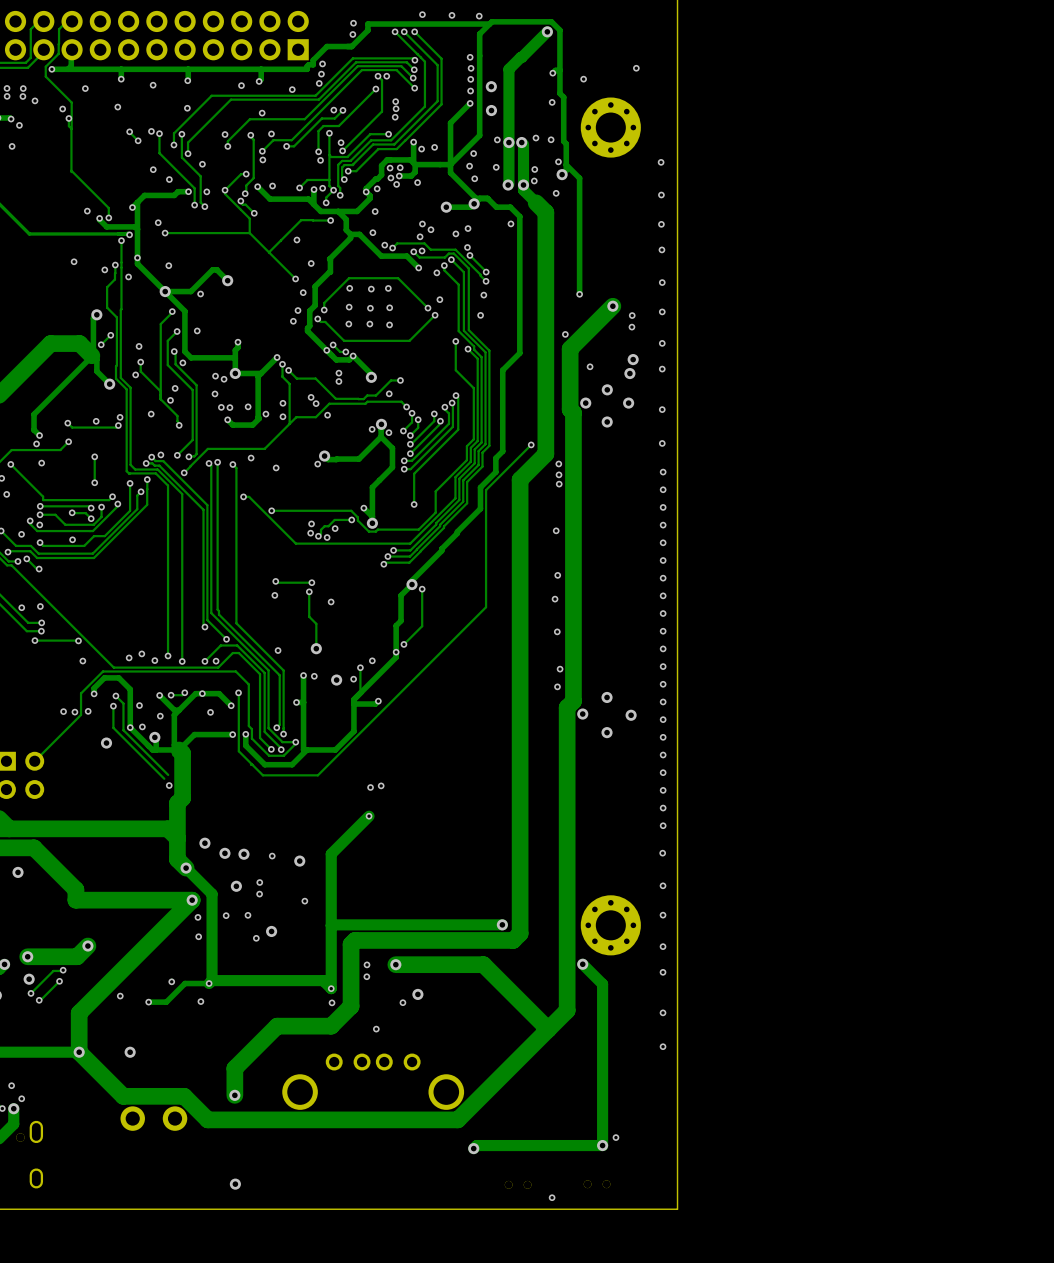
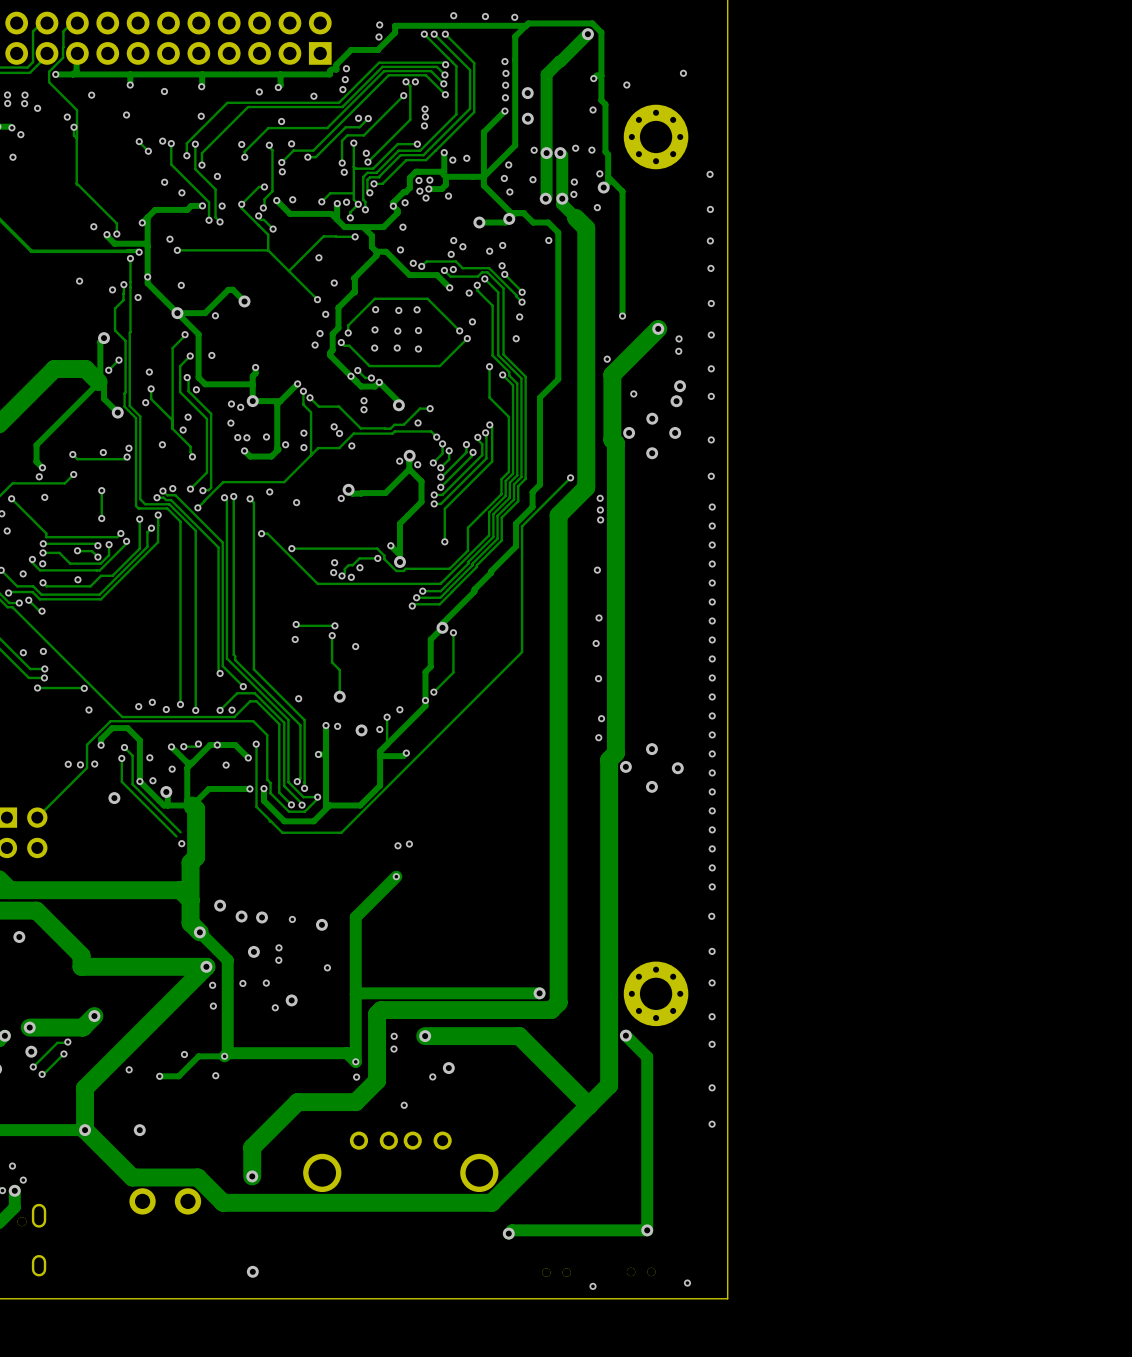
via position: (615, 1137) -> (687, 1283)

